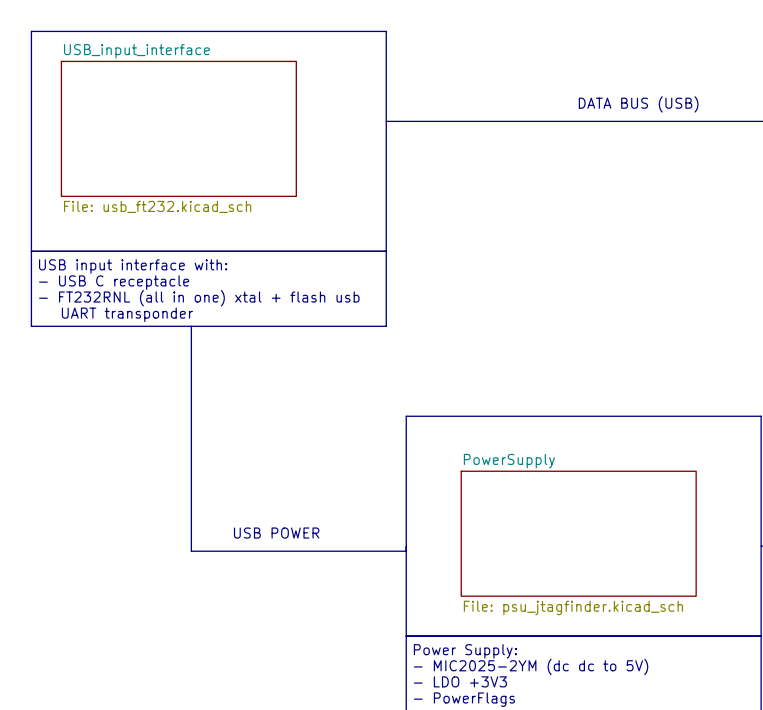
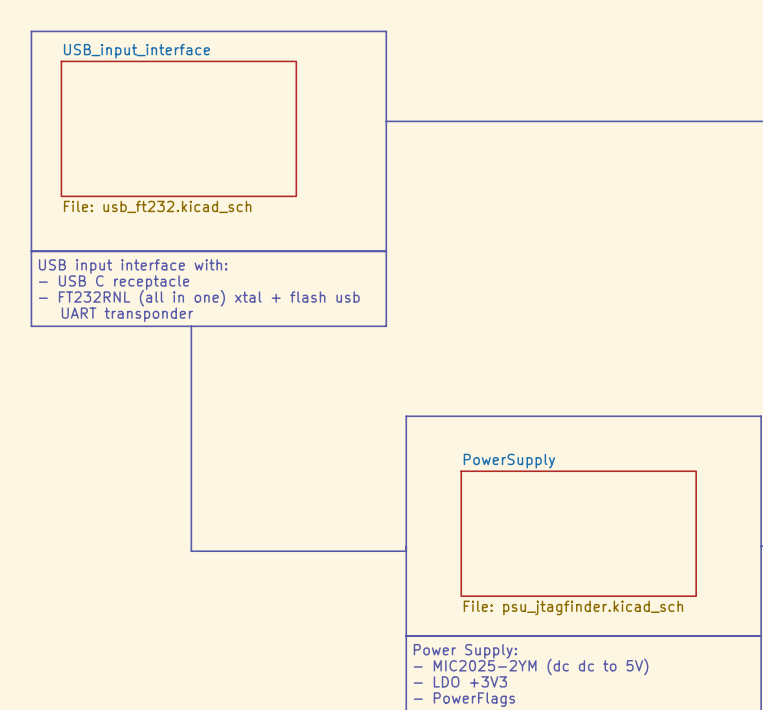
text: DATA BUS (USB) (638, 104) -> none
text: USB POWER (276, 533) -> none

